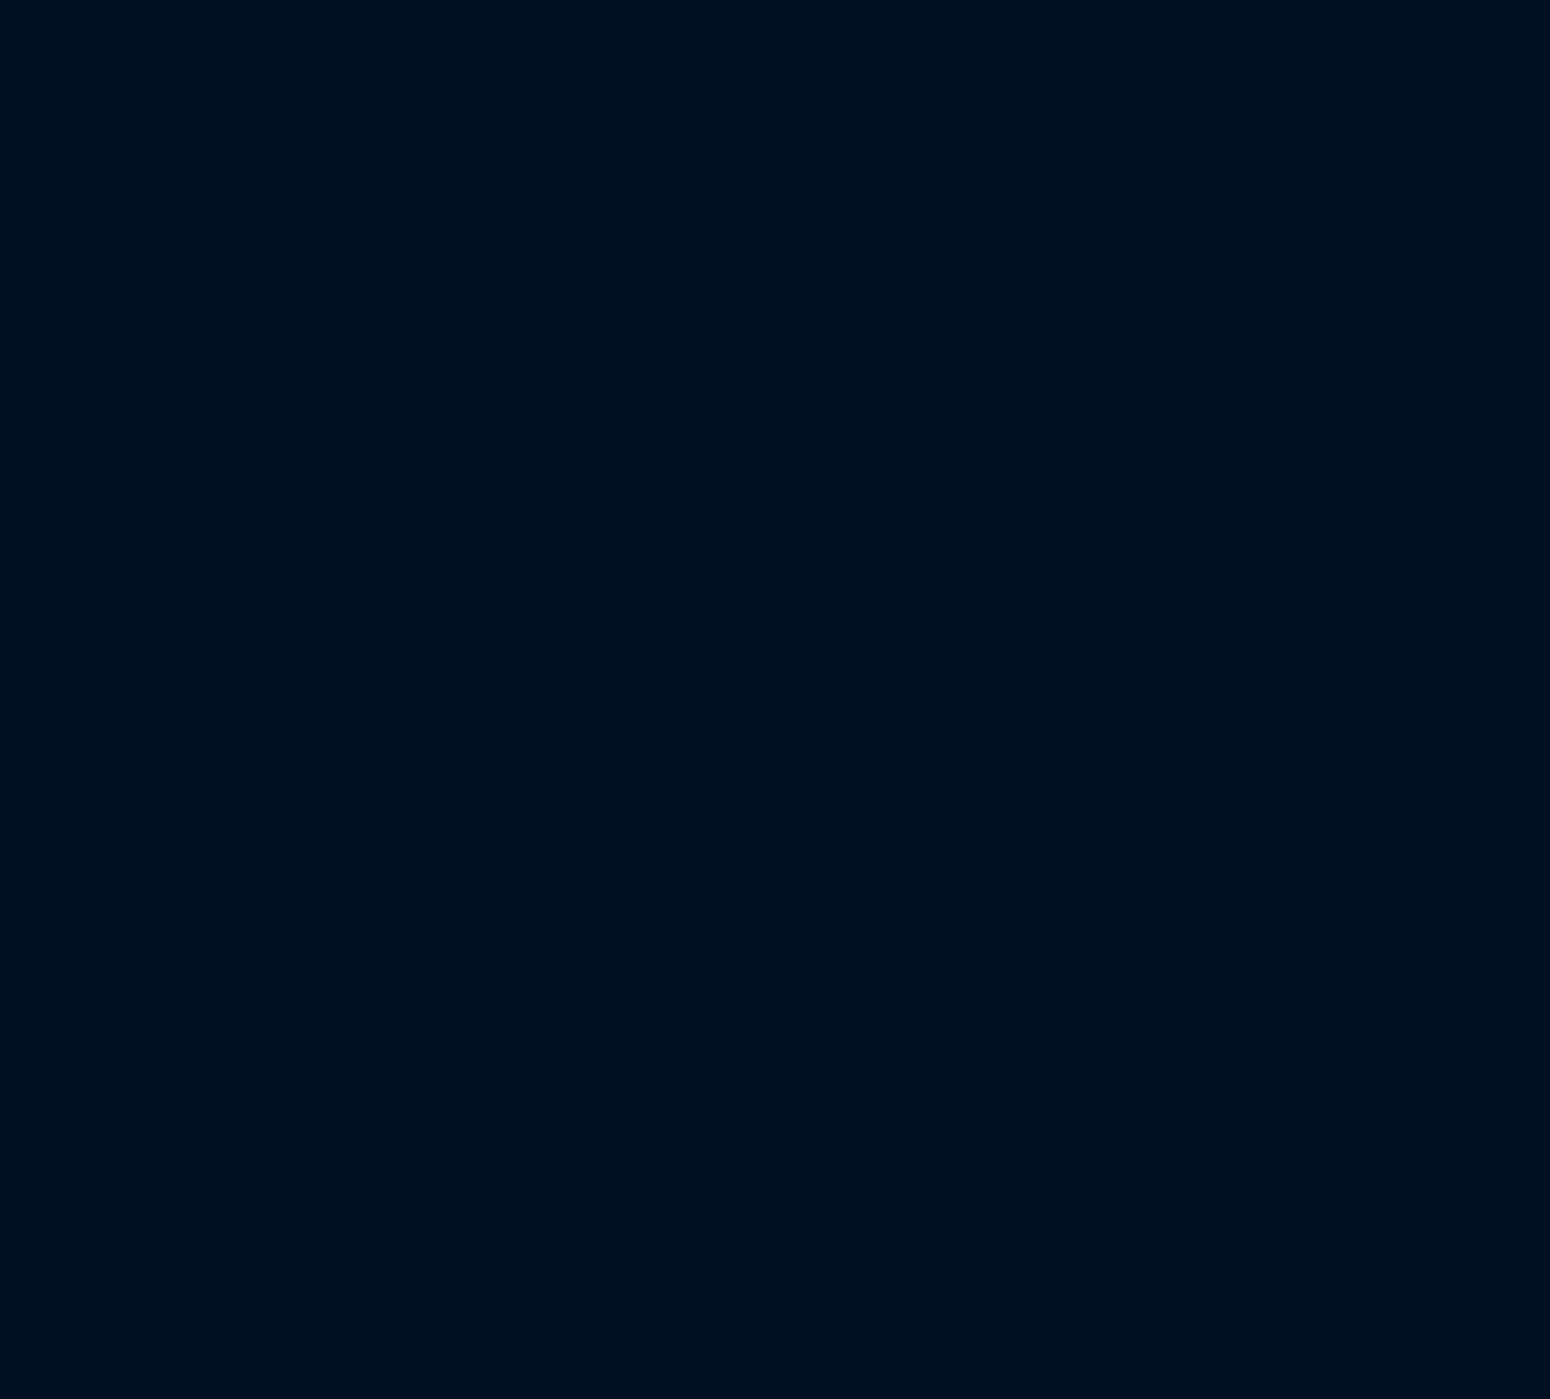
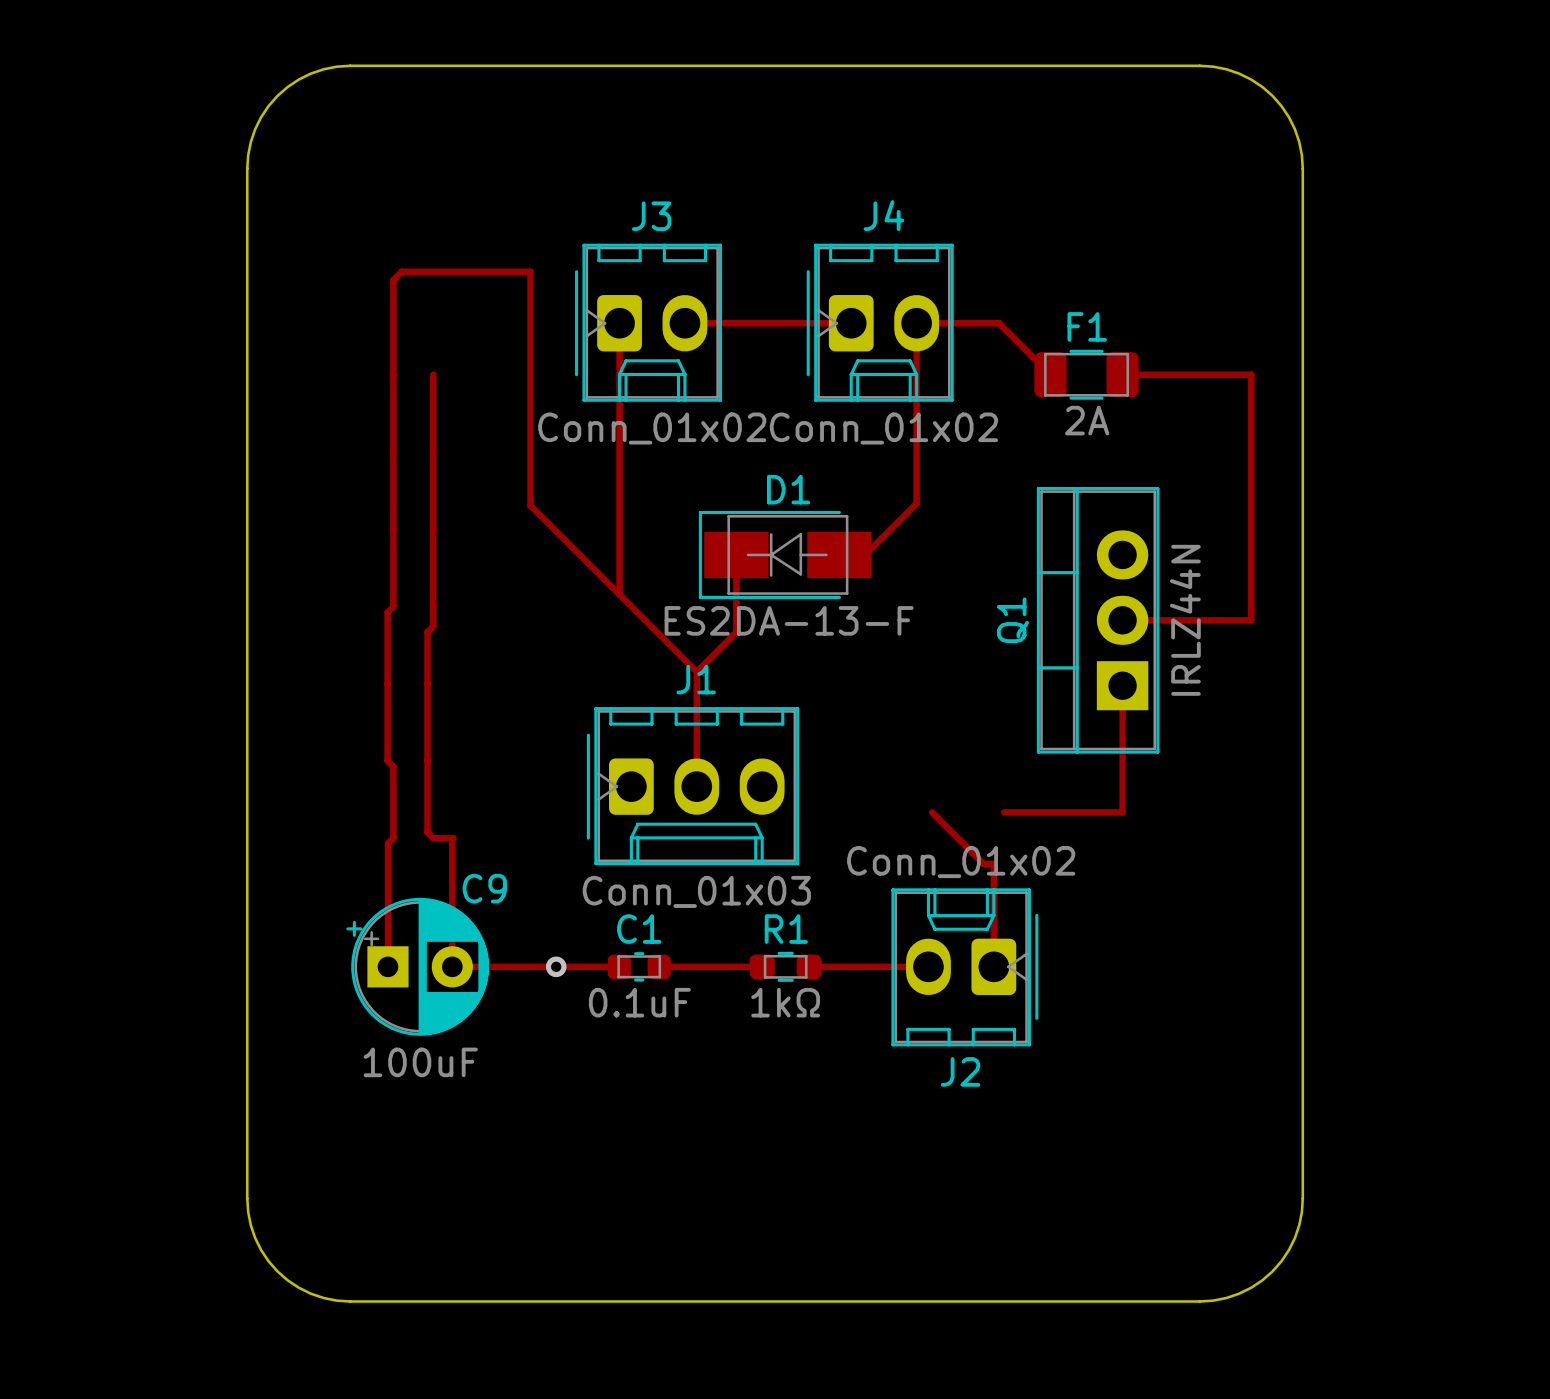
board edge: none -> (350, 65) (1199, 65) (1226, 69) (1251, 79) (1272, 95) (1281, 106) (1294, 129) (1299, 142) (1302, 168) (1302, 1198) (1299, 1225) (1288, 1250) (1281, 1261) (1262, 1280) (1239, 1293) (1226, 1297) (1199, 1301) (350, 1301) (323, 1297) (310, 1293) (287, 1280) (268, 1261) (261, 1250) (250, 1225) (247, 1198) (248, 155) (250, 142) (261, 117) (277, 95) (287, 87) (310, 73) (323, 69) (350, 65)
J3: none -> Conn_01x02 (648, 322)
J4: none -> Conn_01x02 (880, 322)
top track: none -> (619, 323) (619, 594)
top track: none -> (684, 323) (851, 323)
top track: none -> (433, 374) (433, 626) (427, 632) (427, 832) (433, 838) (453, 838) (452, 966) (619, 966)
top track: none -> (1050, 374) (999, 323) (916, 323) (916, 503) (865, 554) (839, 554)
F1: none -> 2A (1086, 374)
top track: none -> (1122, 374) (1251, 374) (1251, 620) (1122, 620)
top track: none -> (736, 554) (736, 632) (696, 671)
D1: none -> ES2DA-13-F (785, 554)
Q1: none -> IRLZ44N (1098, 620)
top track: none -> (696, 671) (696, 786)
top track: none -> (696, 671) (530, 505) (530, 271) (401, 271) (393, 280) (393, 606) (387, 612) (387, 760) (393, 766) (393, 838) (387, 843) (387, 966)
top track: none -> (1122, 685) (1122, 812) (1004, 812)
J1: none -> Conn_01x03 (693, 786)
top track: none -> (932, 812) (983, 863) (993, 863) (993, 966)
C9: none -> 100uF (417, 966)
via: none -> (556, 966)
C1: none -> 0.1uF (639, 966)
top track: none -> (659, 966) (762, 966)
R1: none -> 1kΩ (785, 966)
top track: none -> (809, 966) (928, 966)
J2: none -> Conn_01x02 (964, 967)

